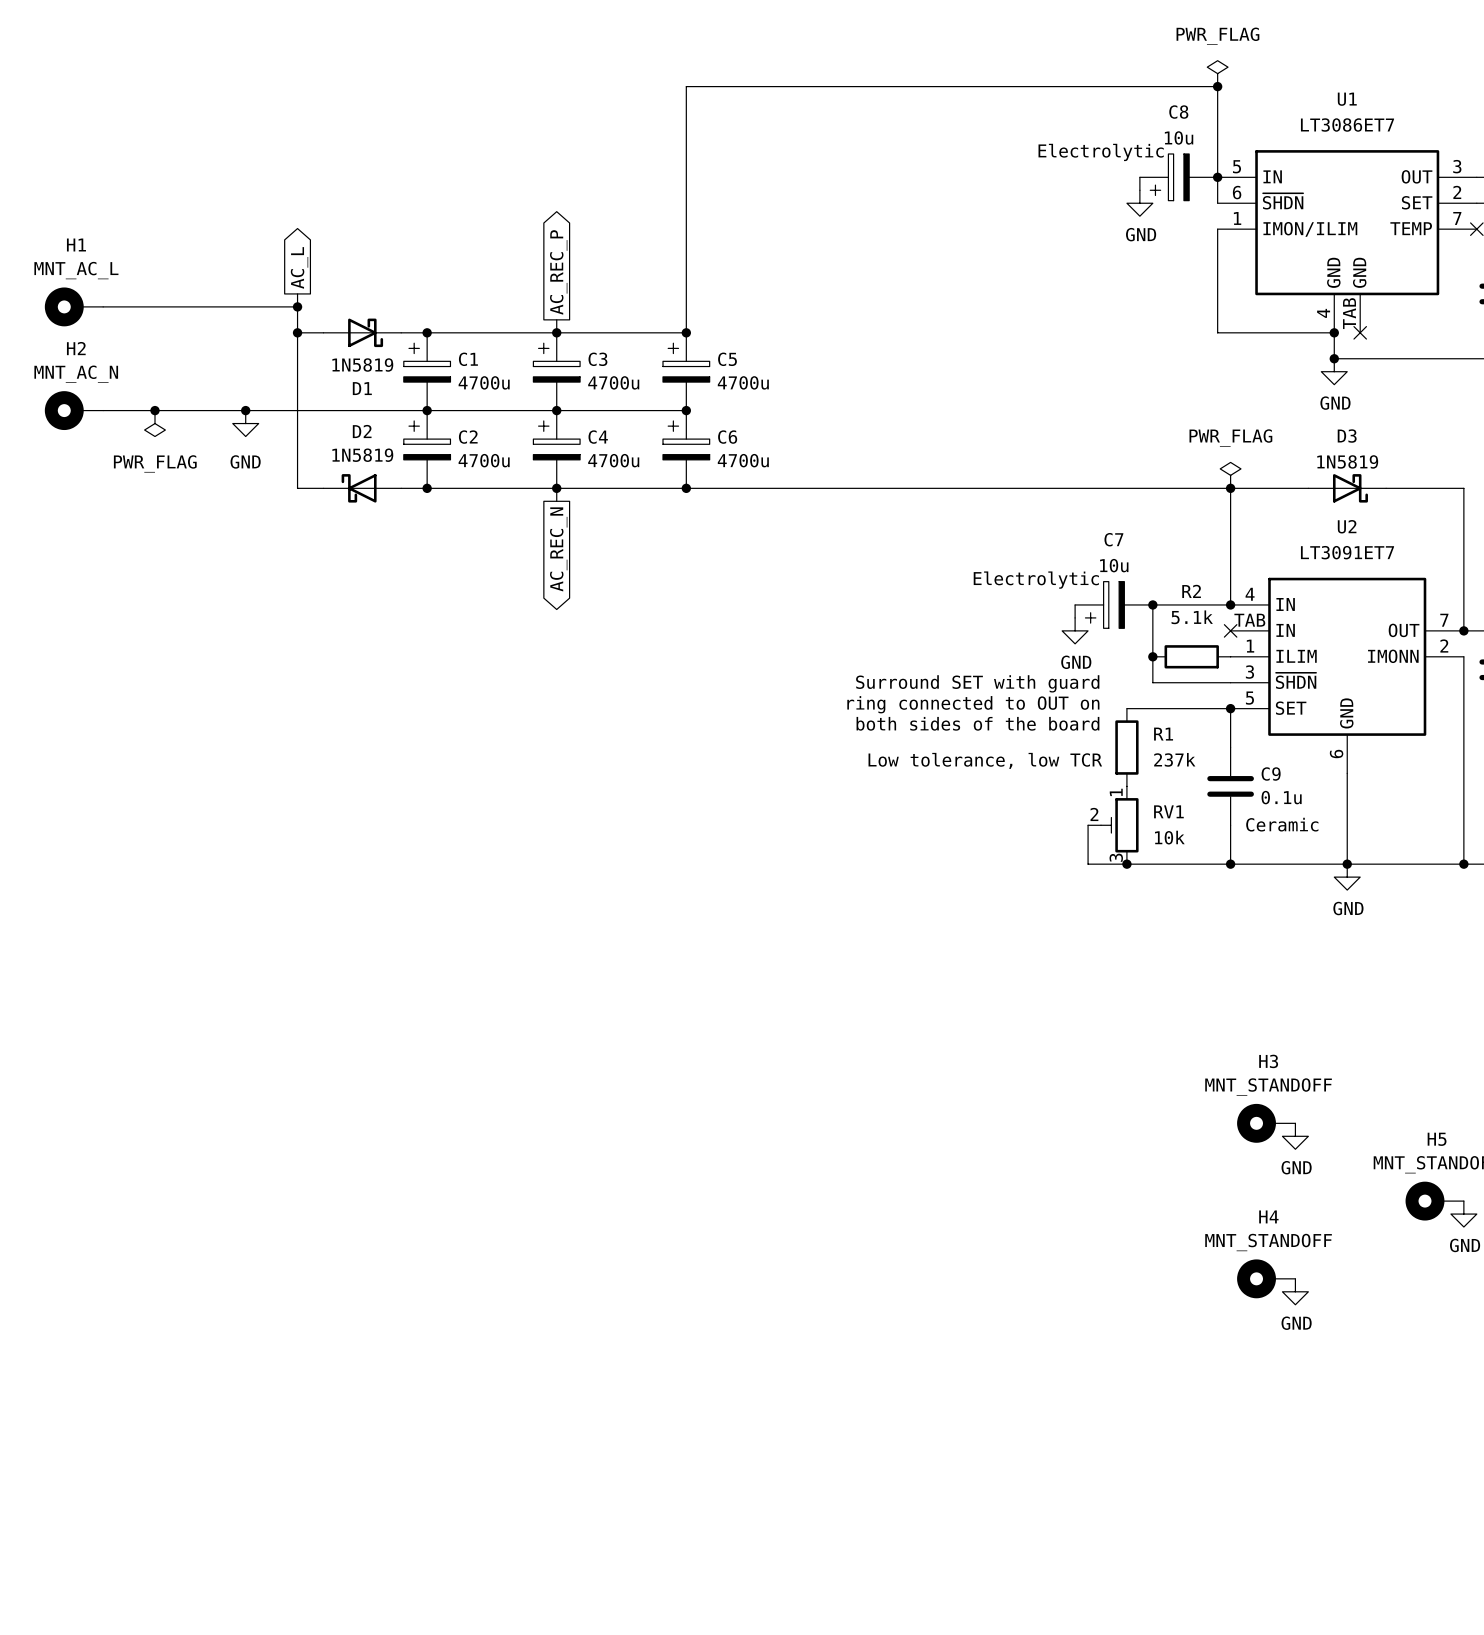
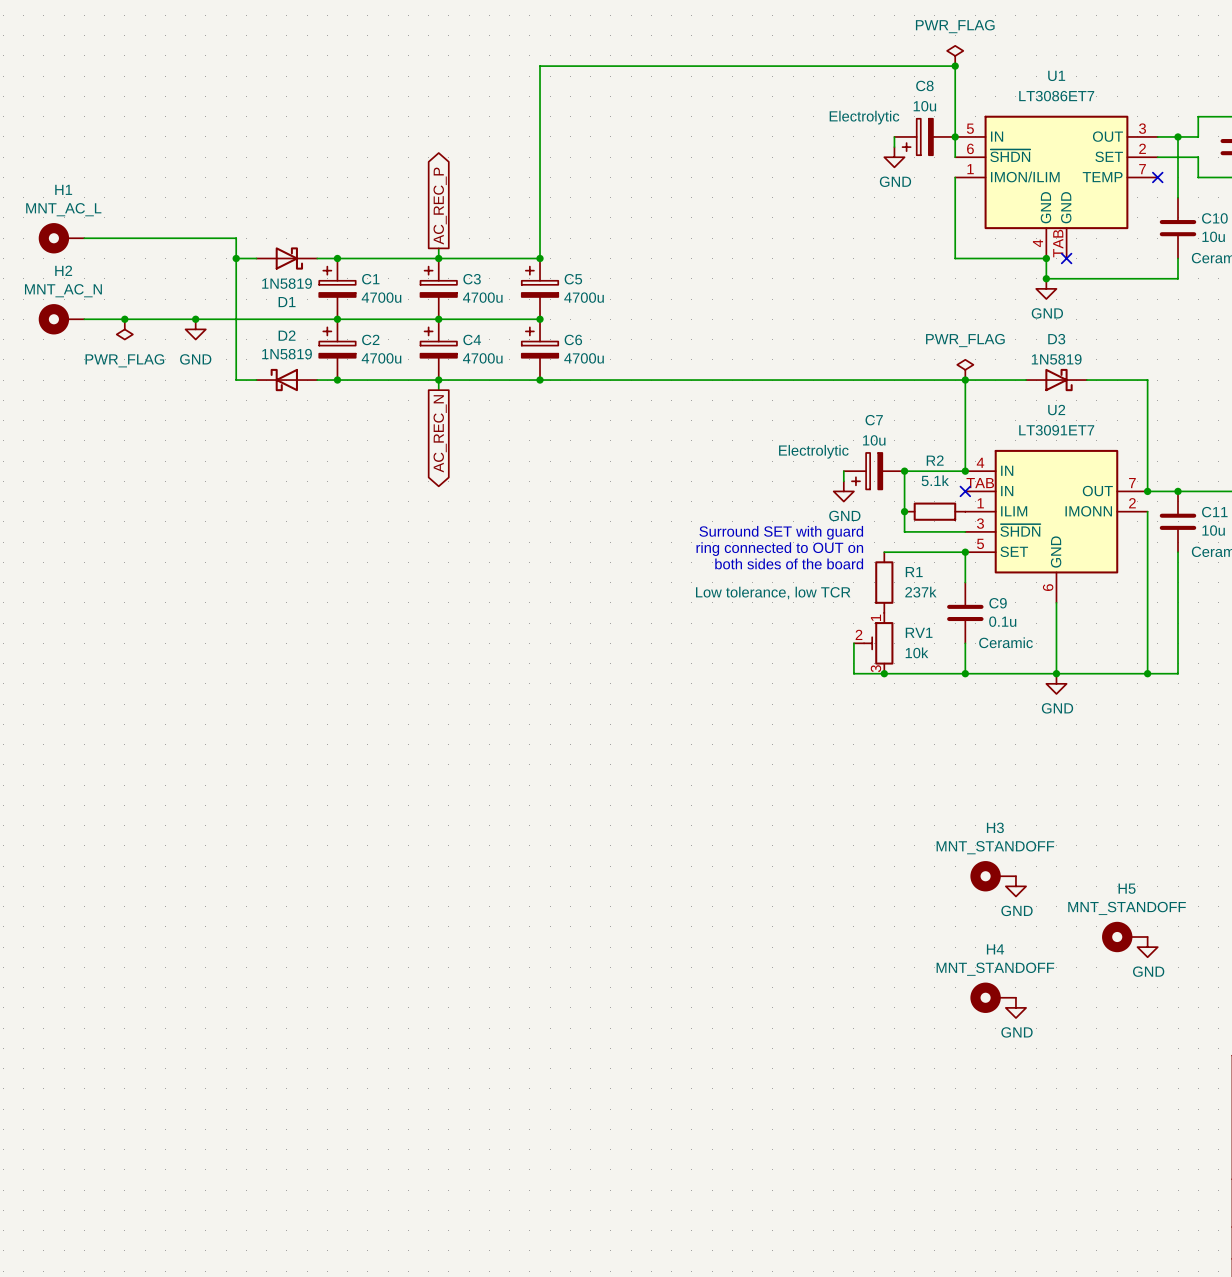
global label: AC_L (299, 267) -> none
wire: (297, 293) (297, 306) -> none
junction: (297, 306) -> none

